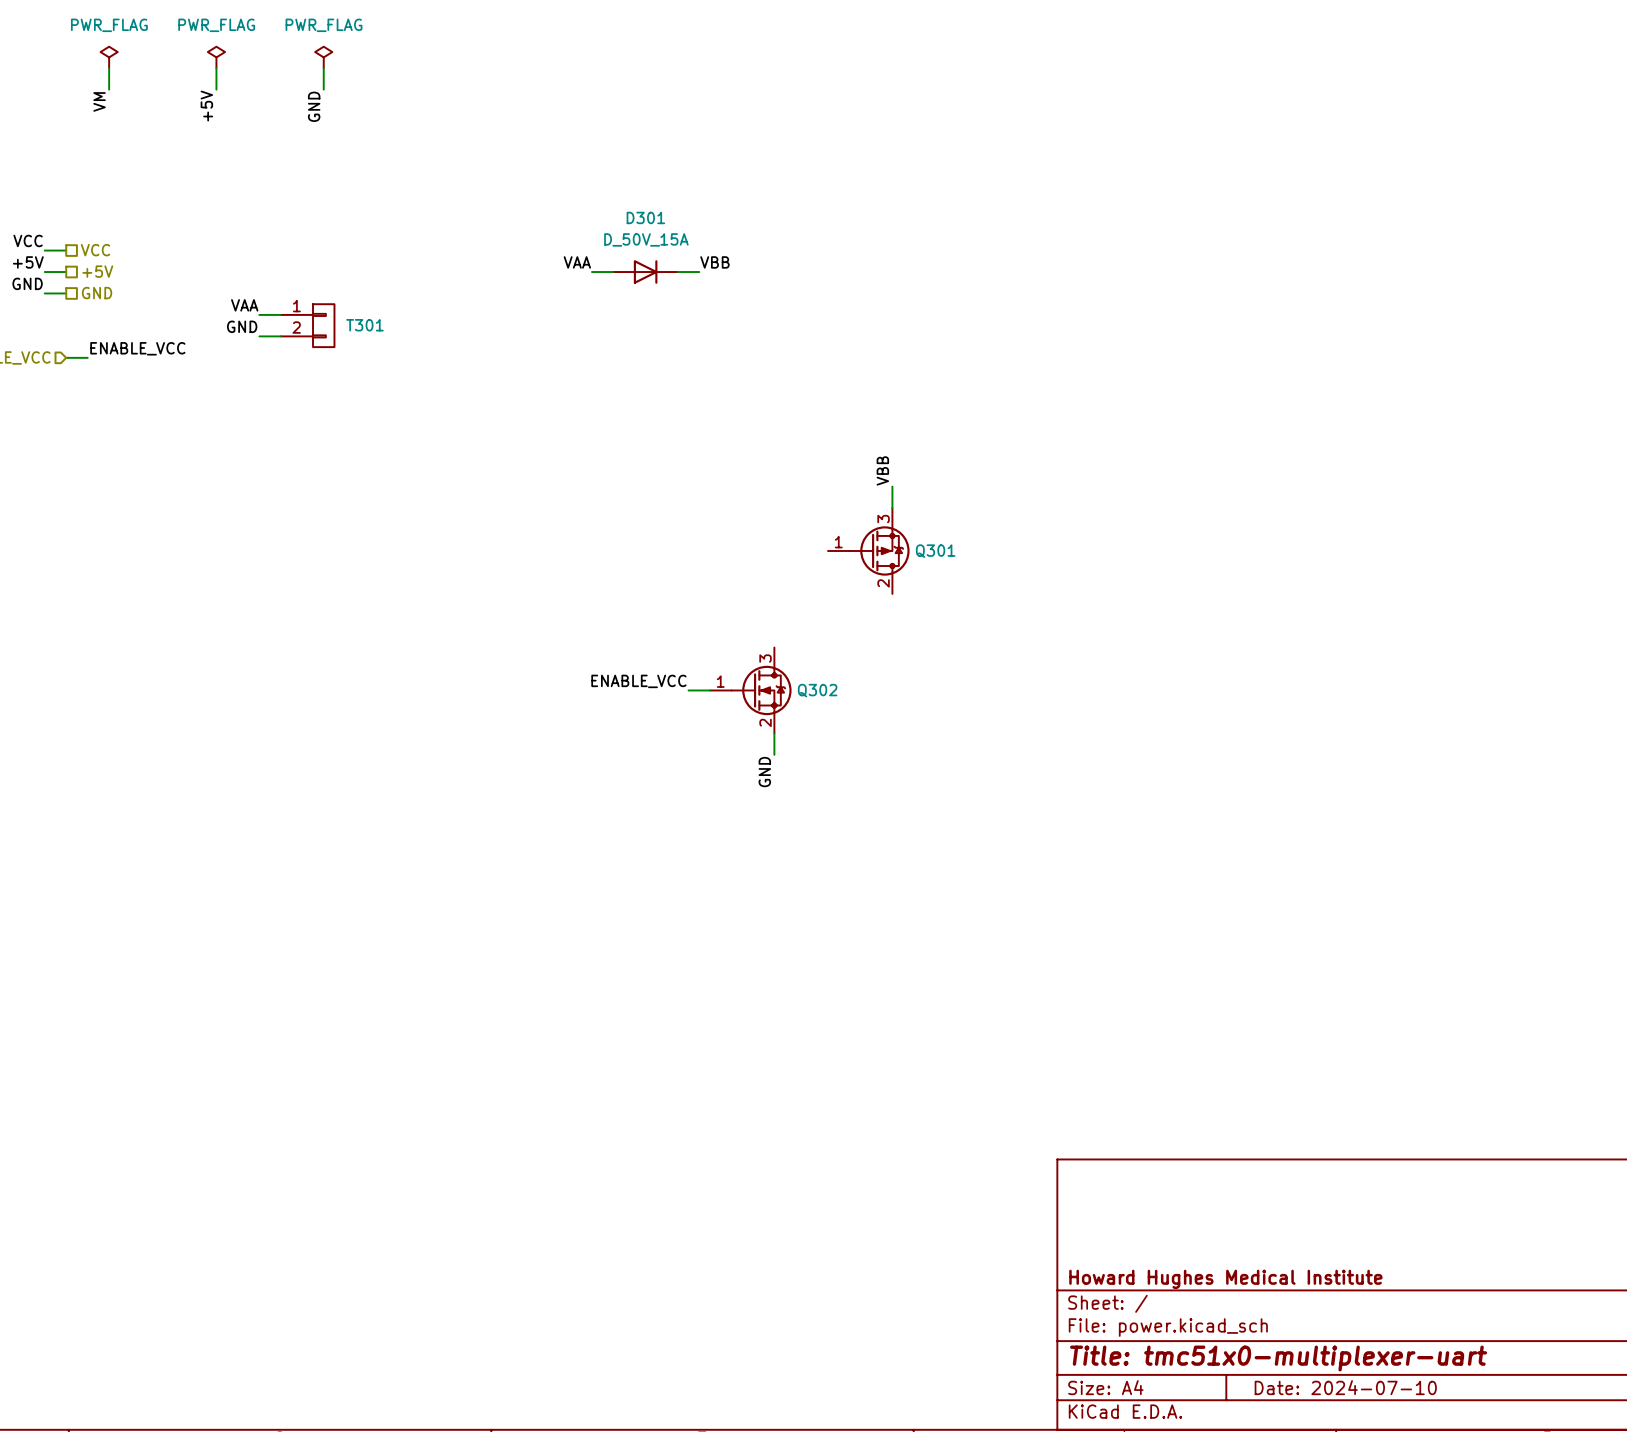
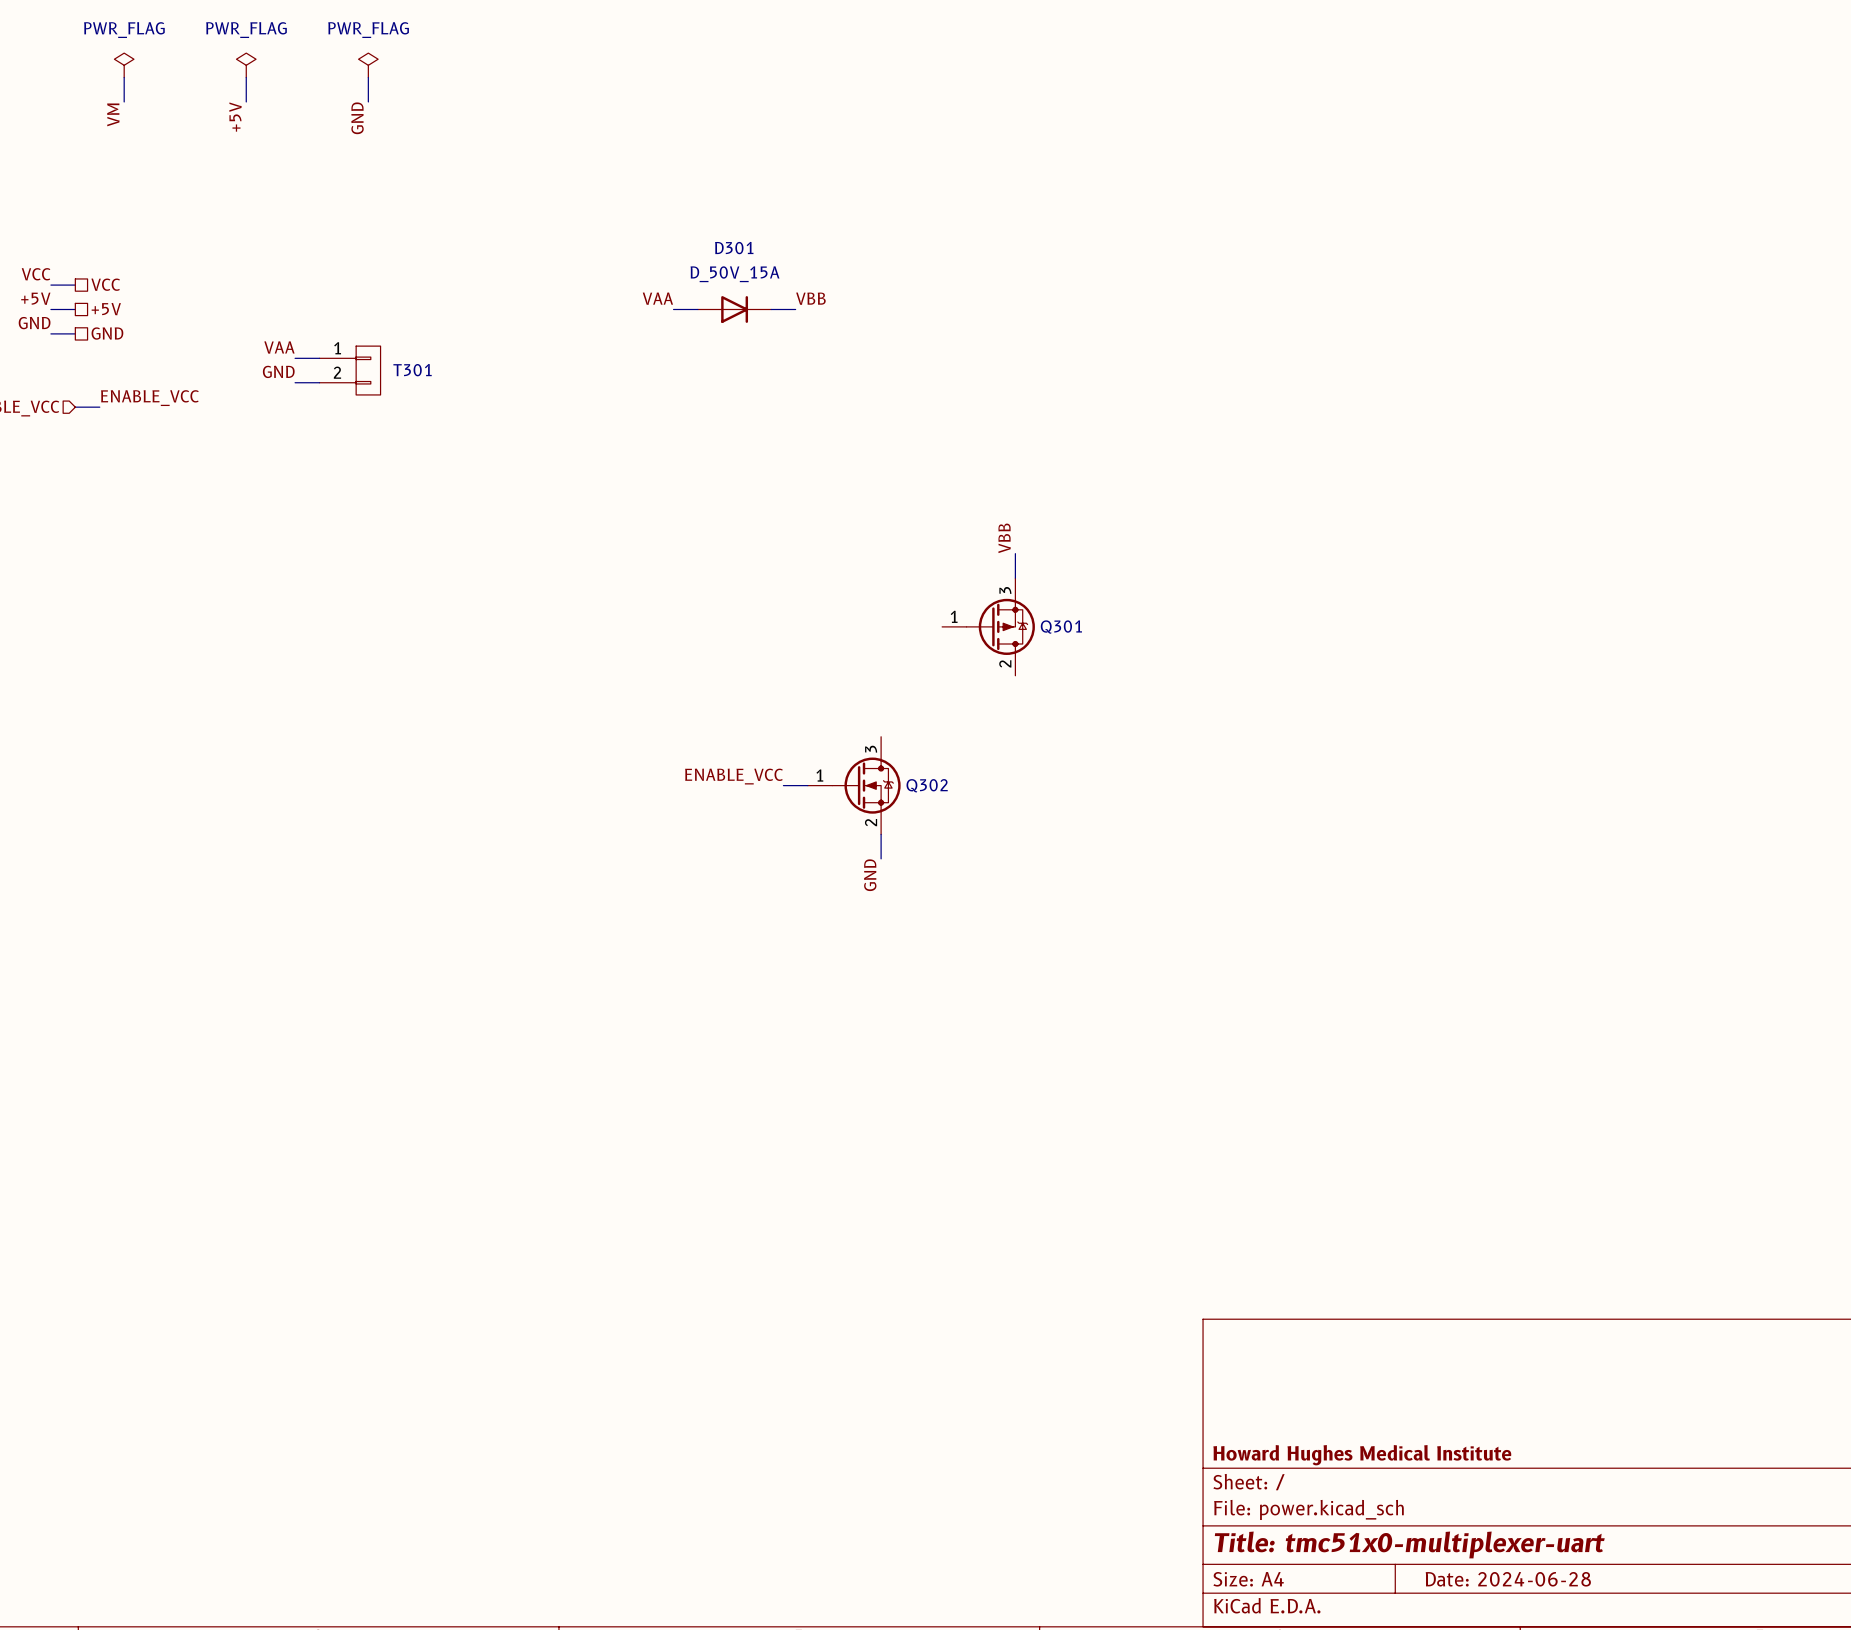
title block: Date: 2024-07-10 (1345, 1387) -> Date: 2024-06-28 (1508, 1579)

